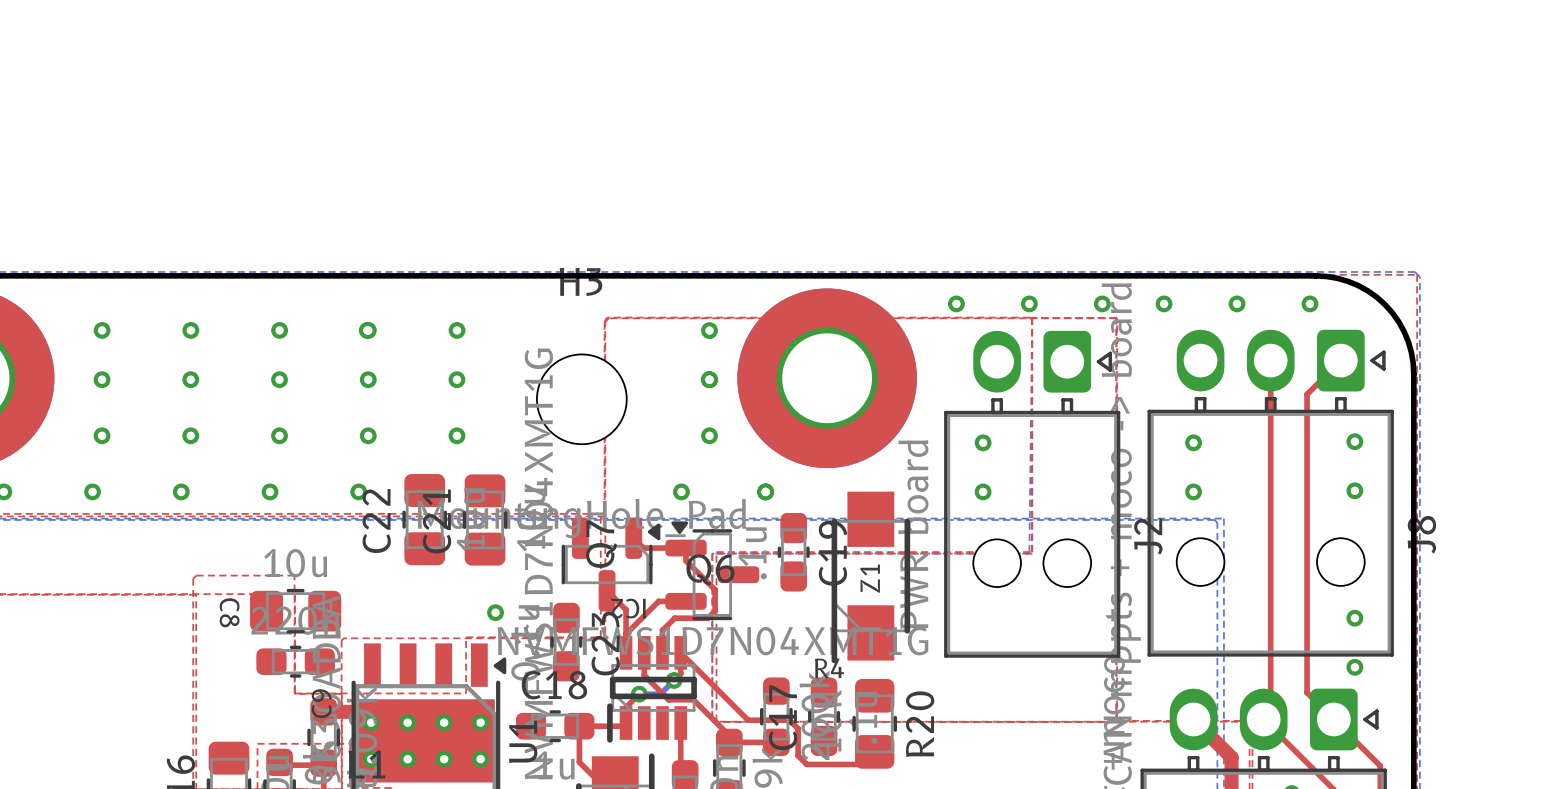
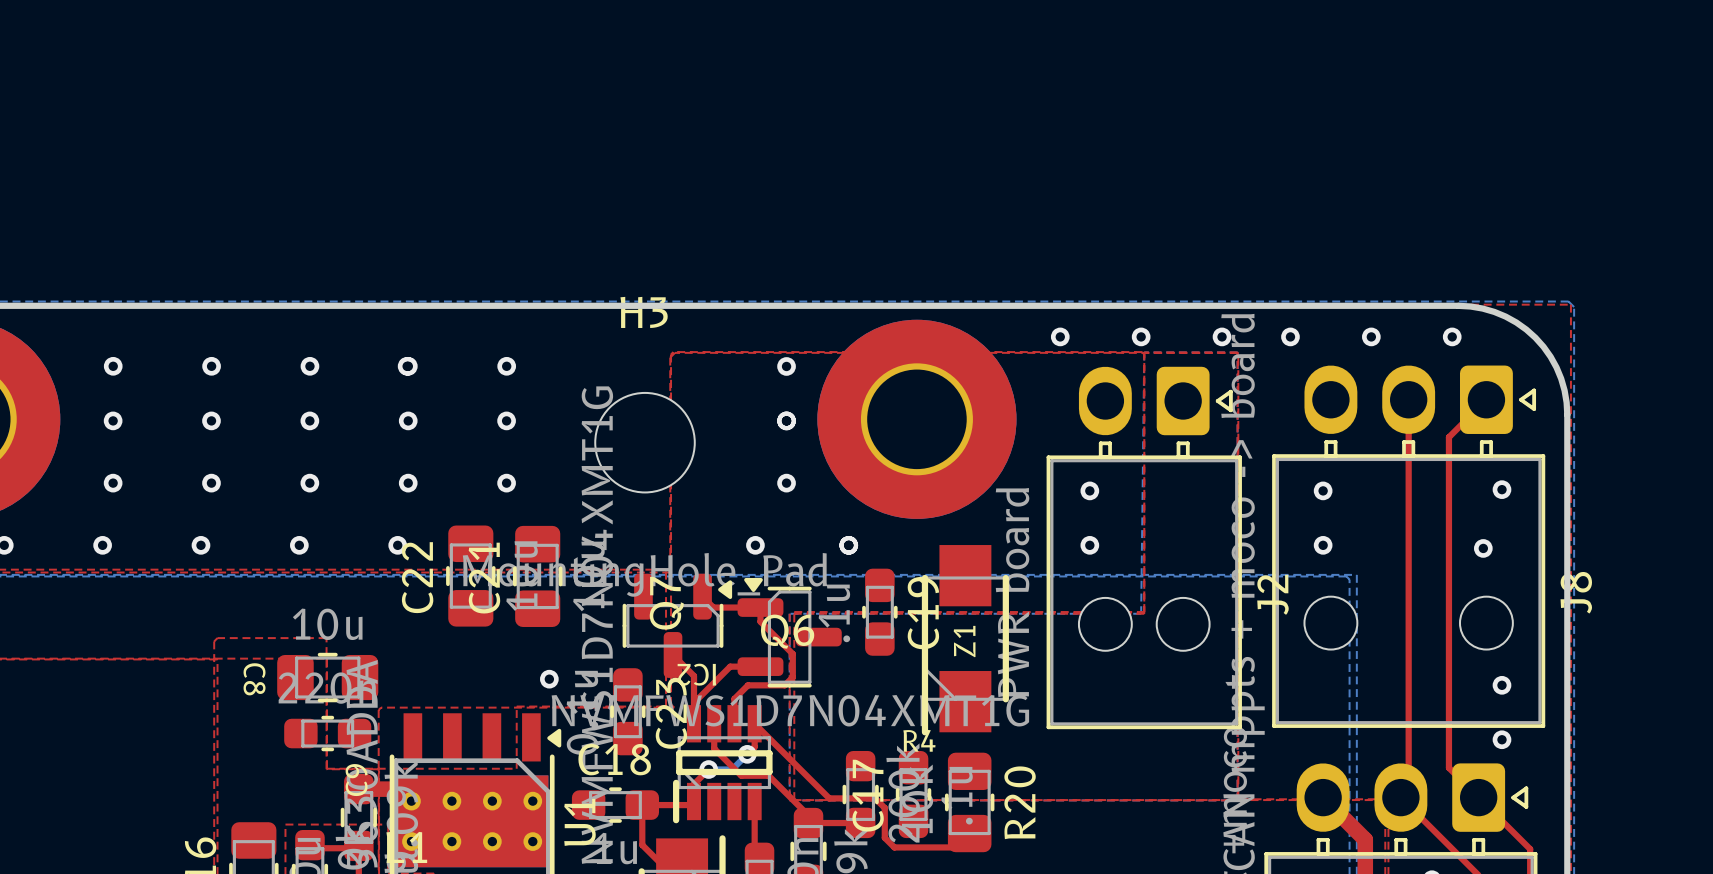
via position: (1354, 490) -> (1483, 548)

